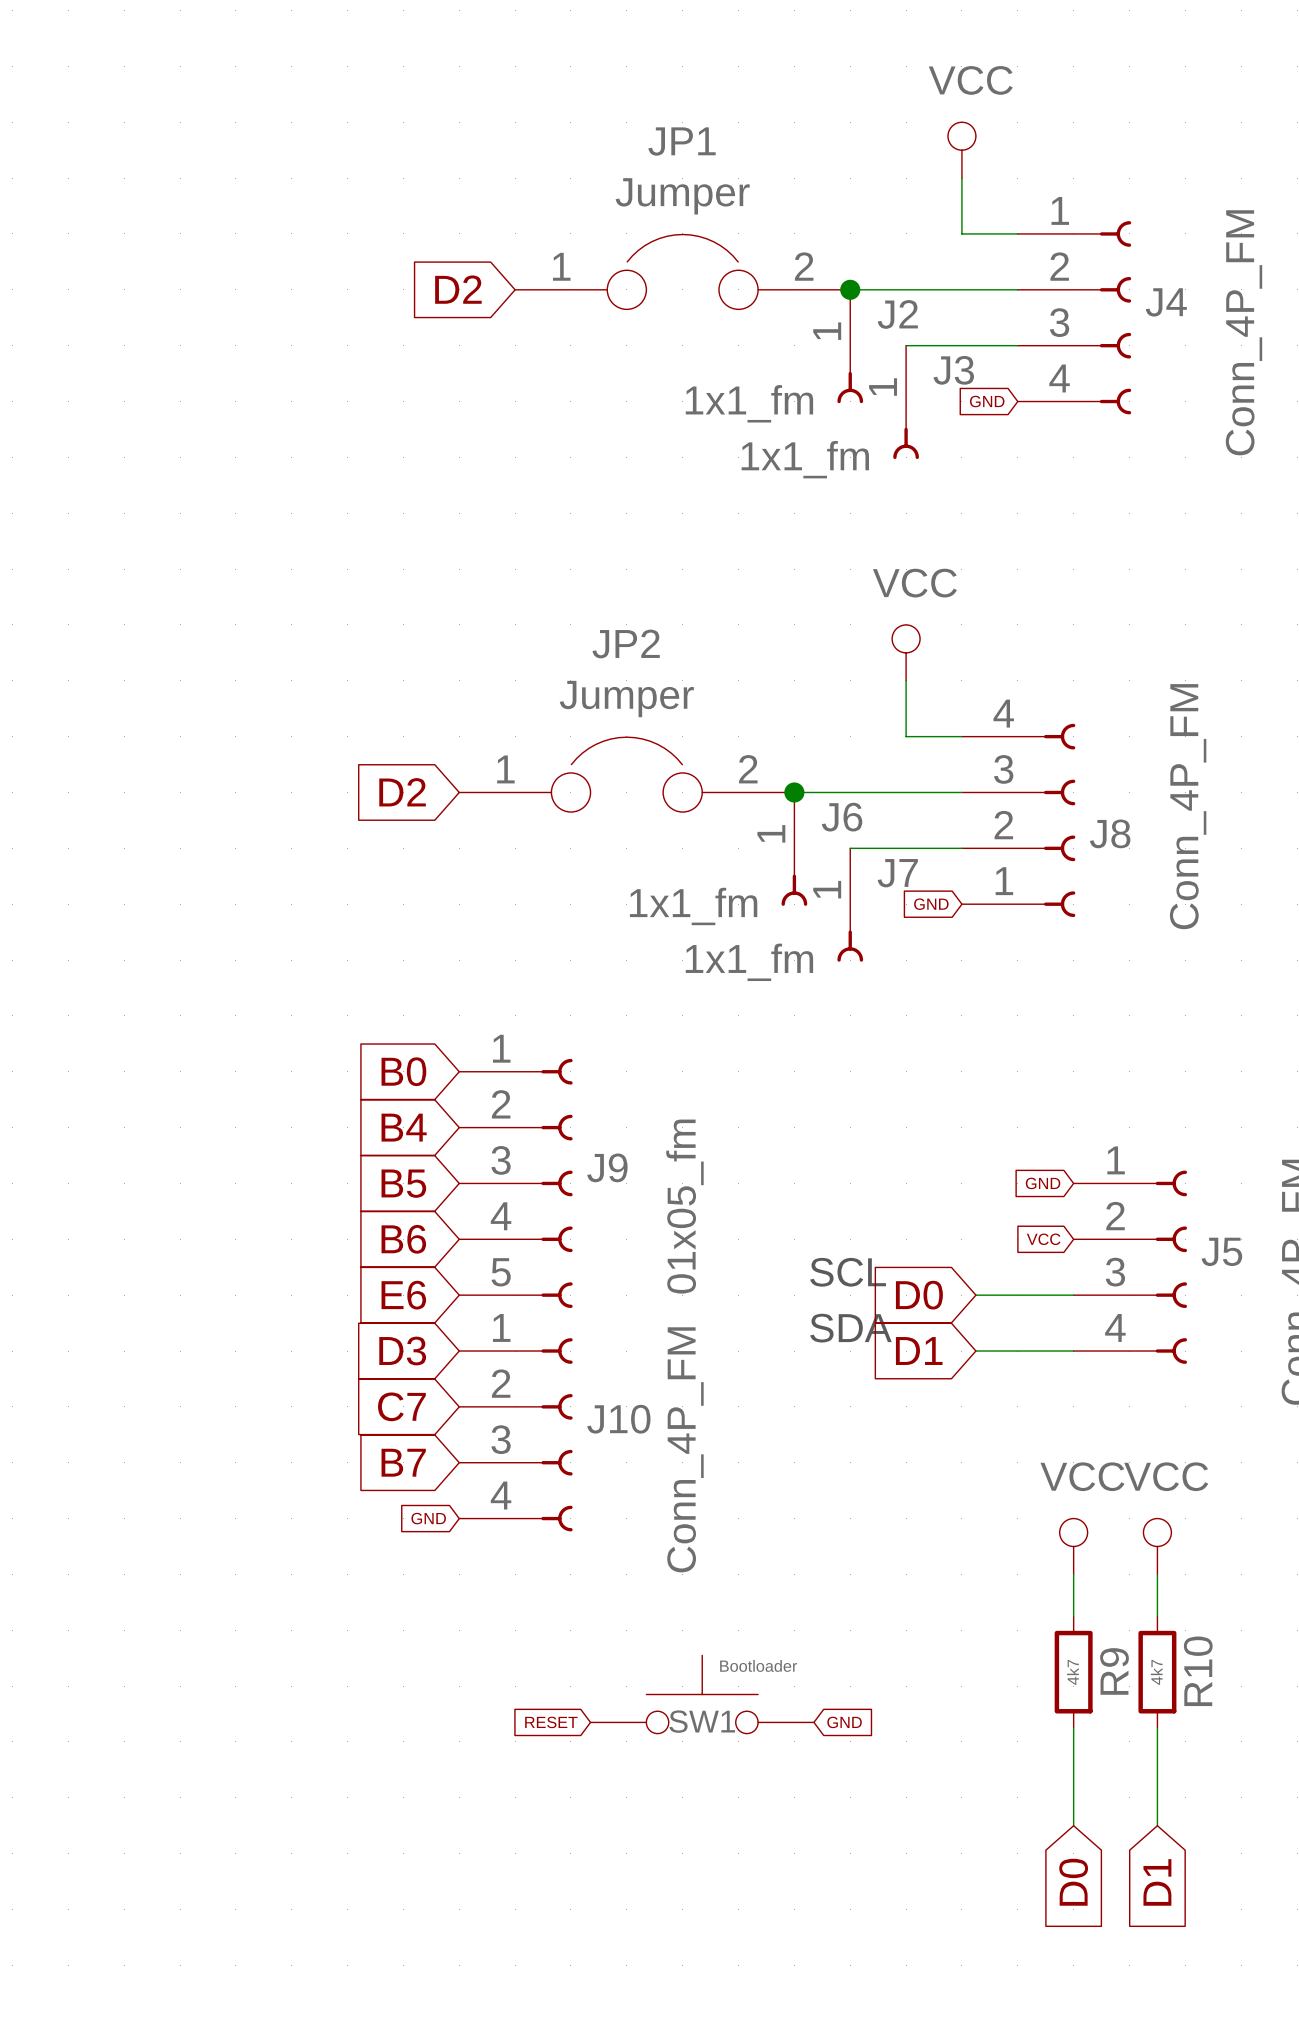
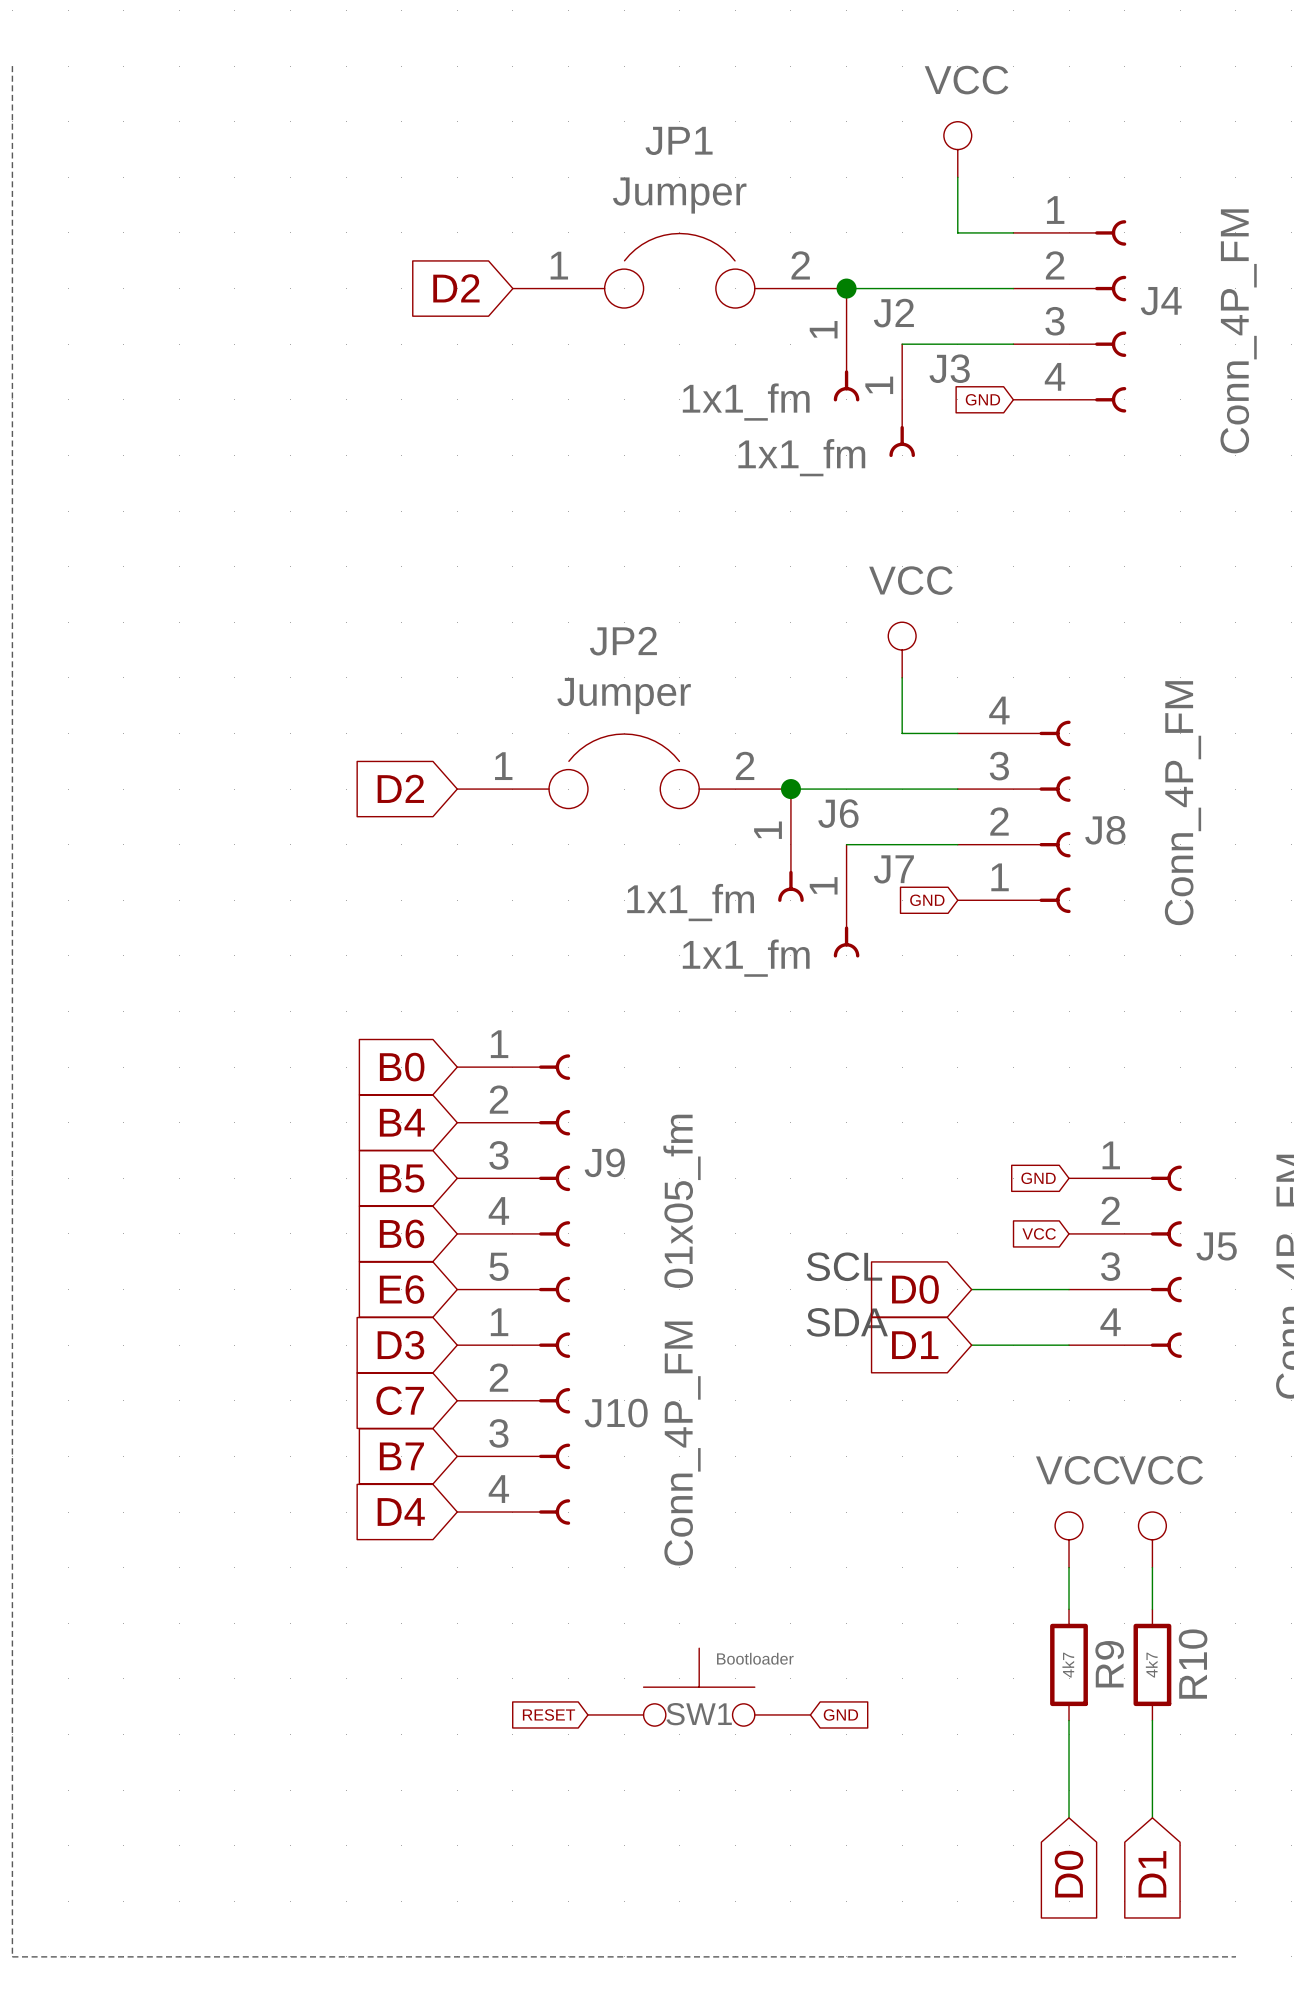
line: none -> (12, 66) (12, 1956) (1235, 1956)
global label: GND (428, 1518) -> D4 (401, 1512)

